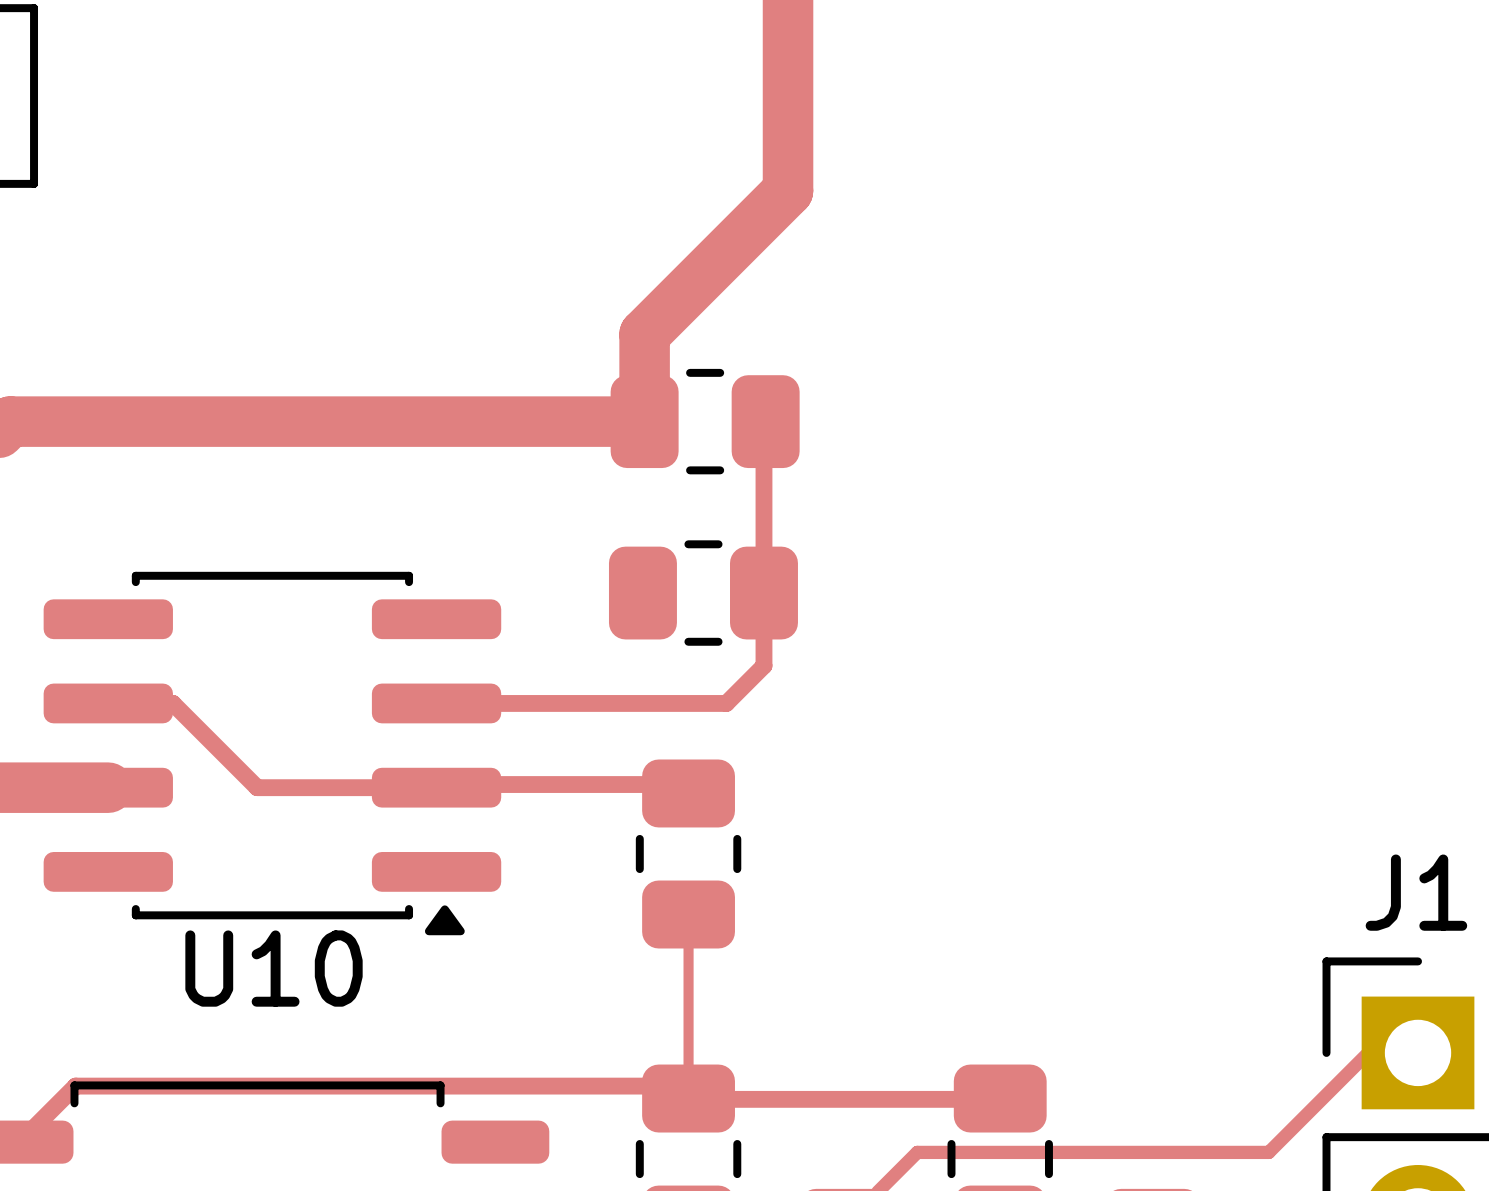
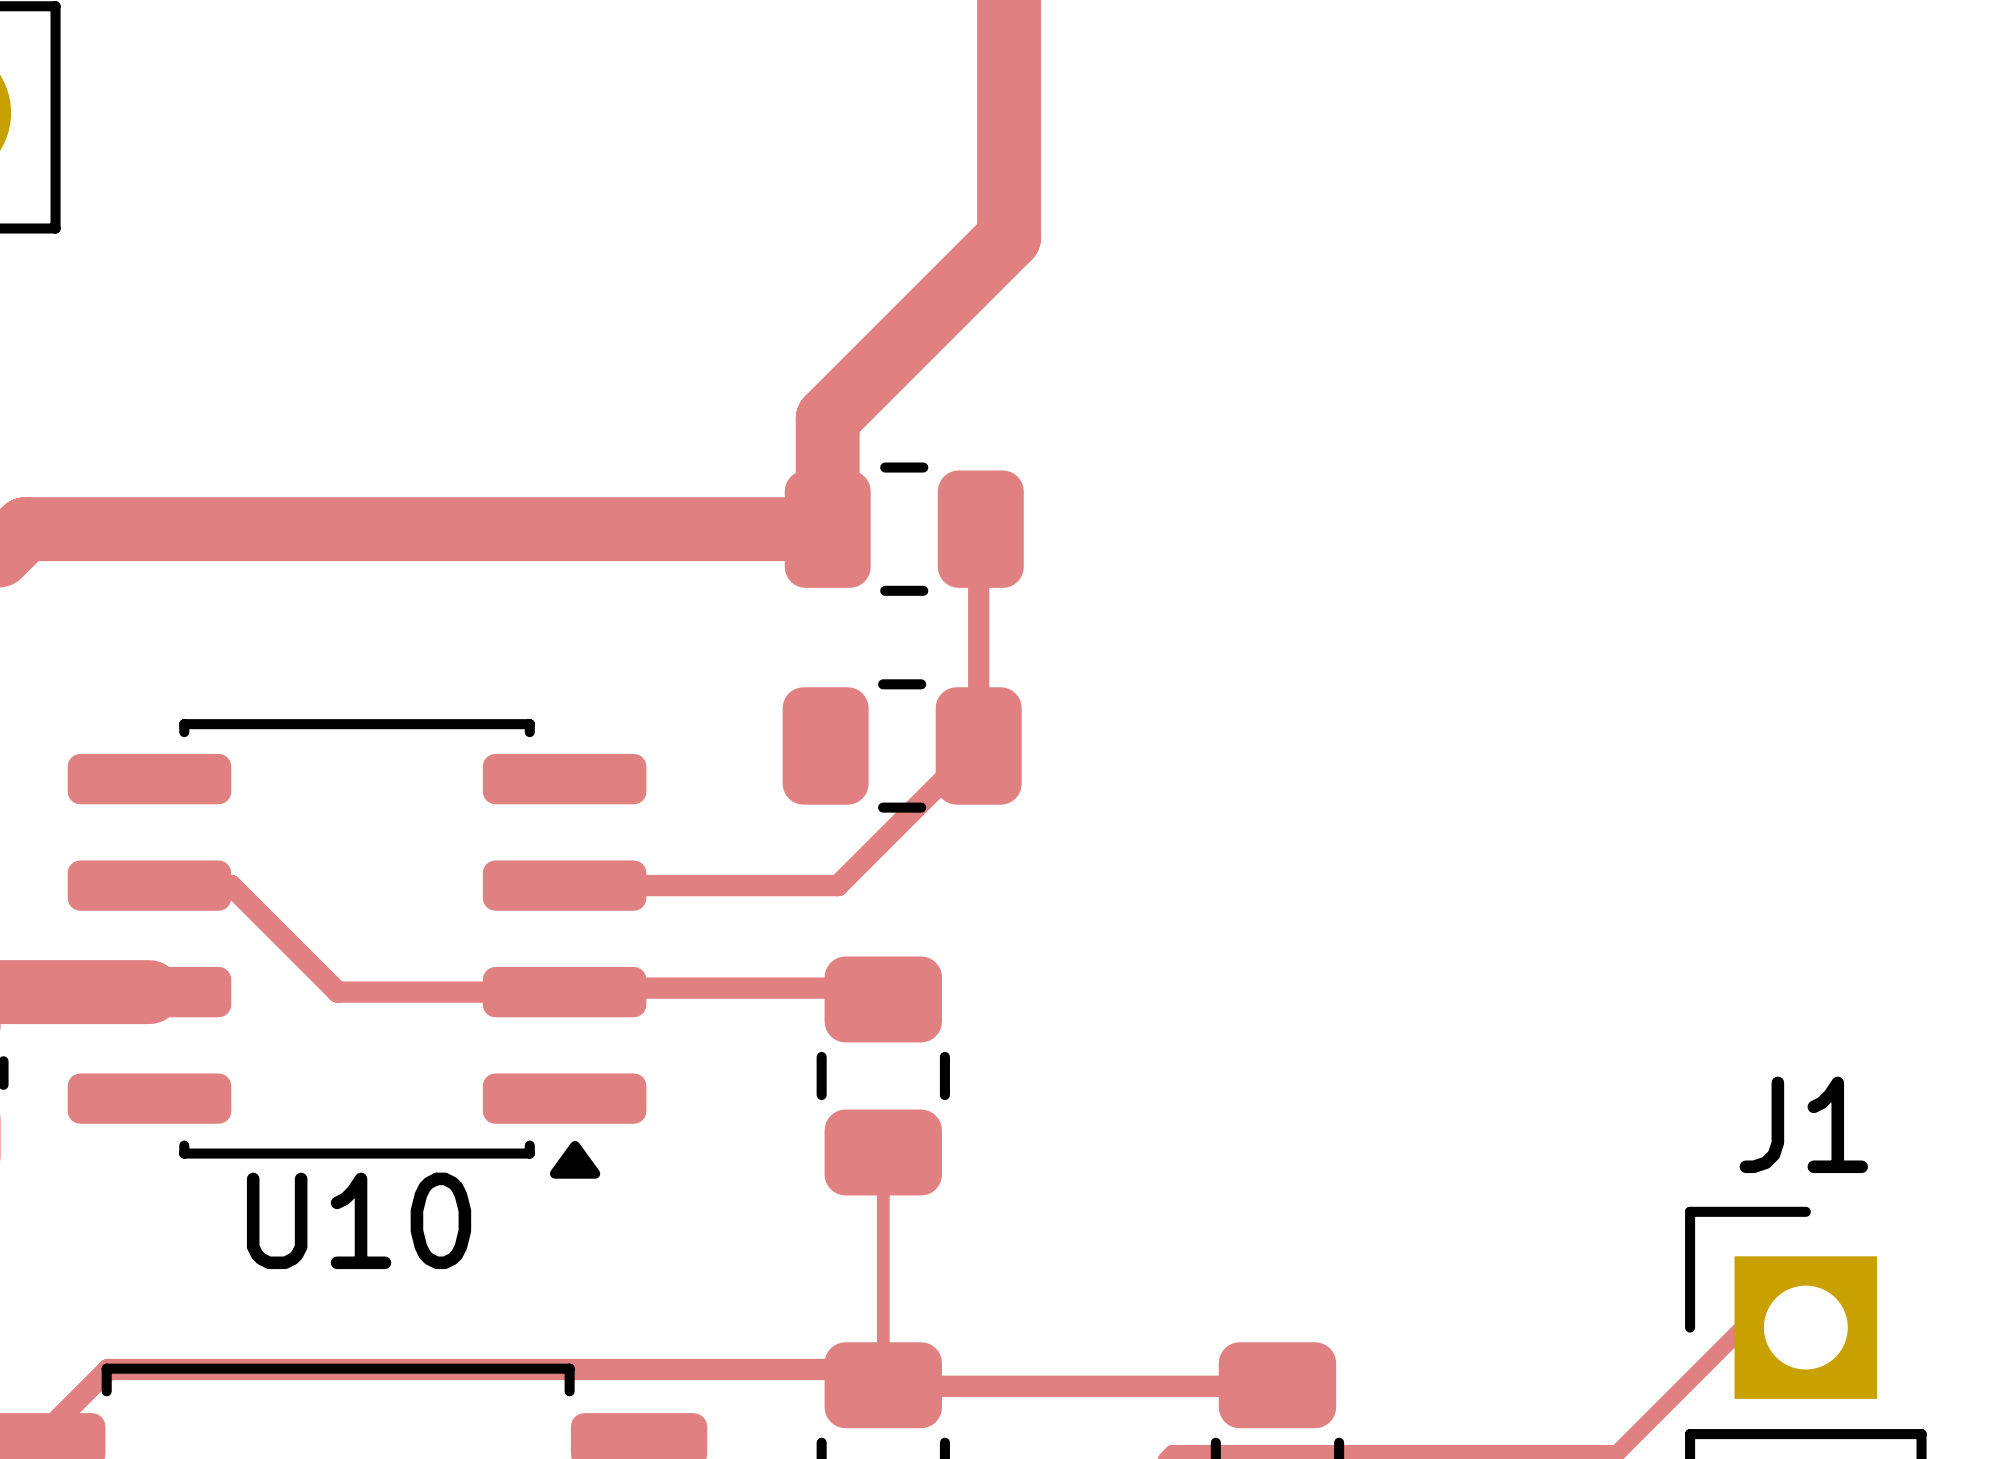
track: (763, 593) (763, 665) (726, 703) (652, 703) -> (977, 745) (838, 885)

